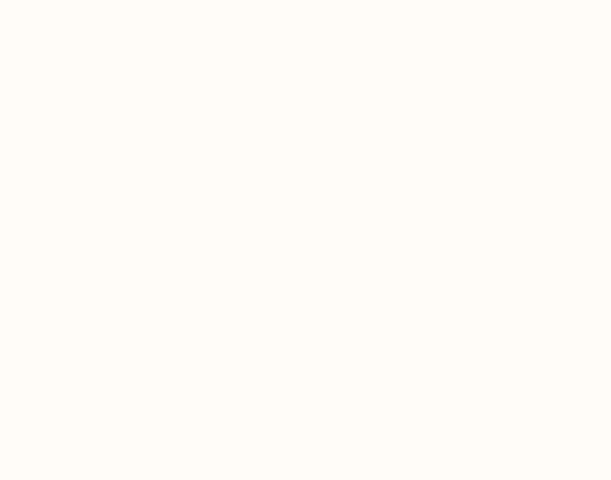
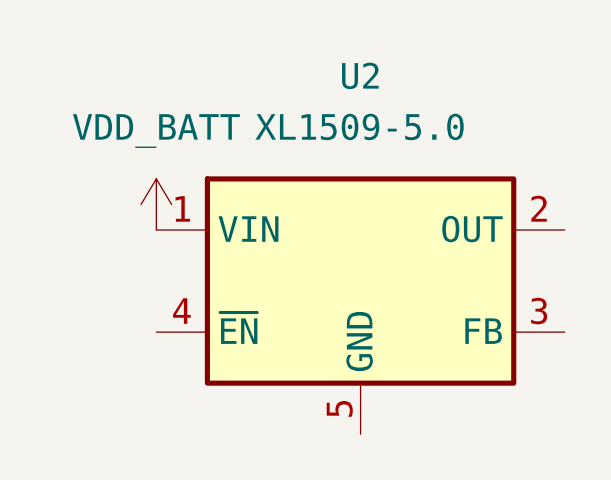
power symbol: none -> VDD_BATT (156, 204)
U2: none -> XL1509-5.0 (360, 305)

